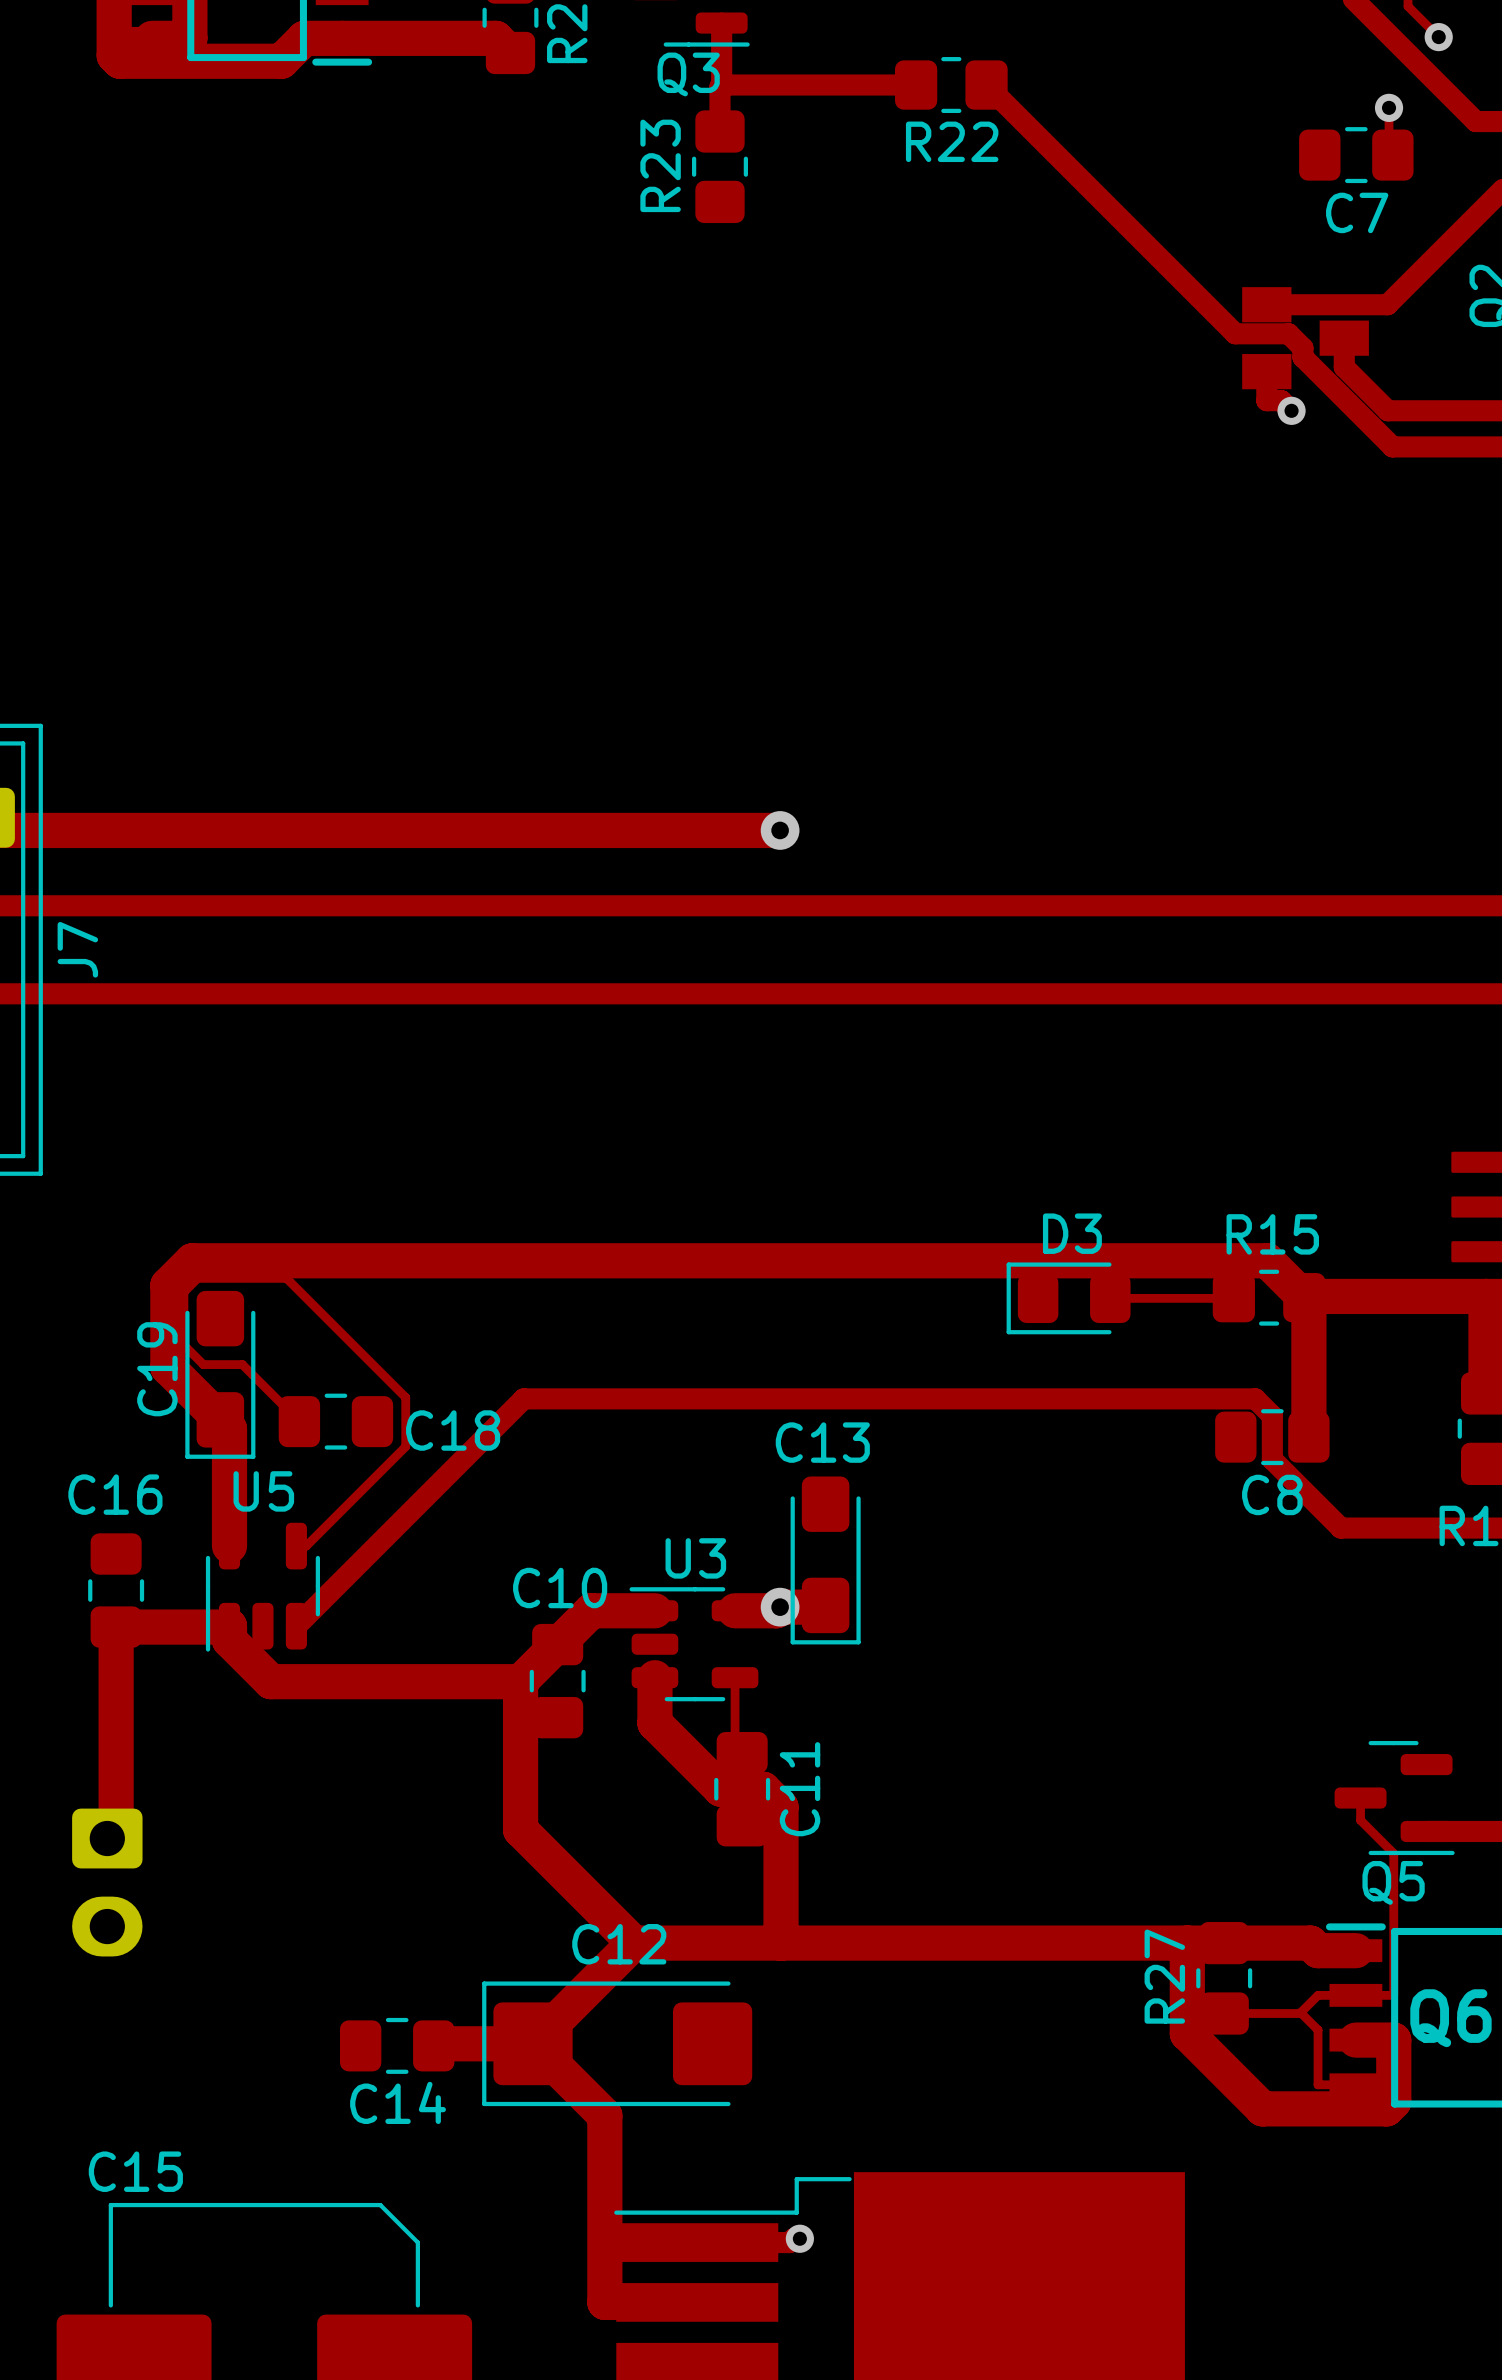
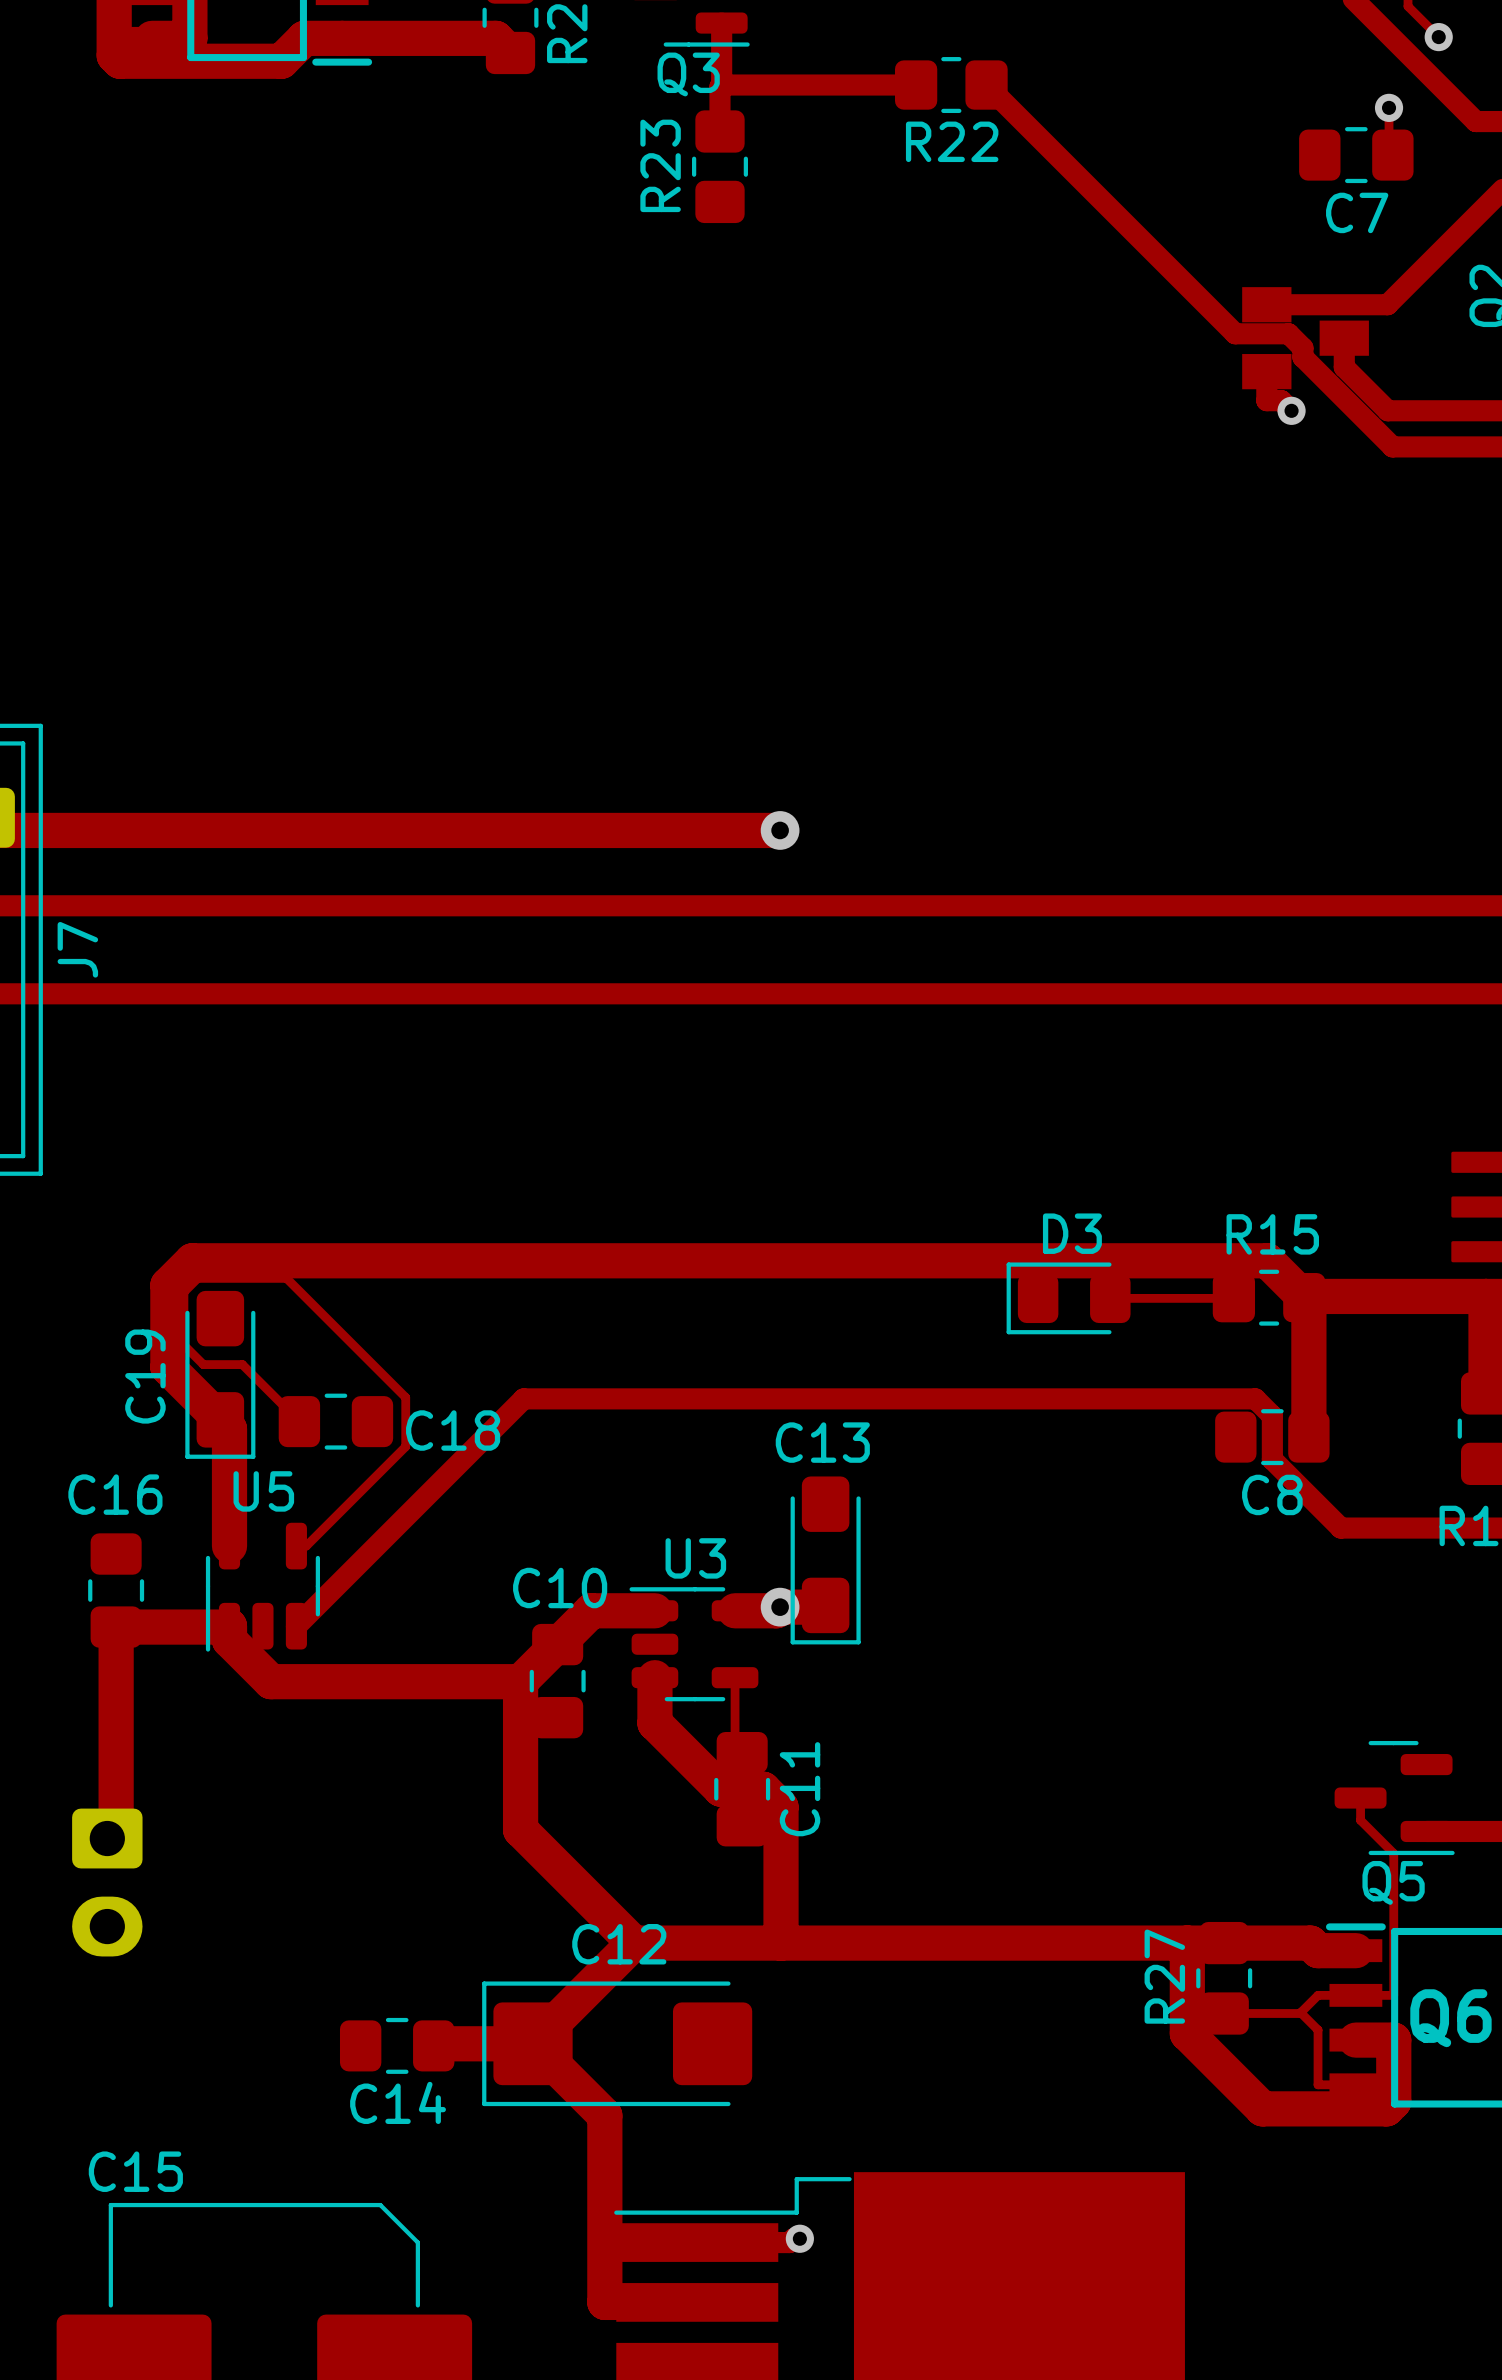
C19 name position: C19 (157, 1369) -> C19 (145, 1376)

